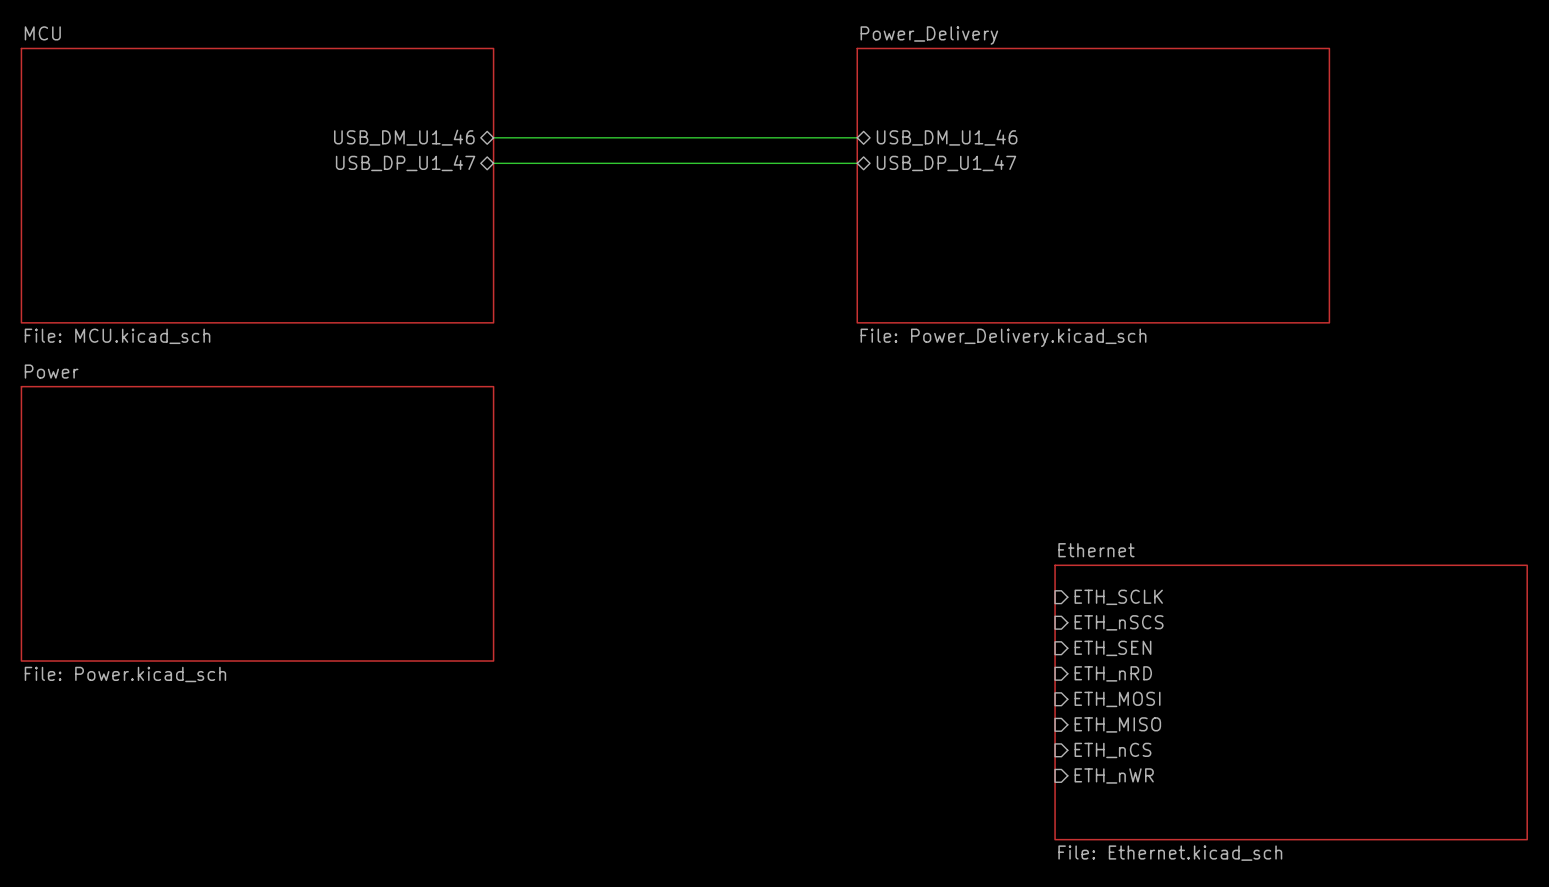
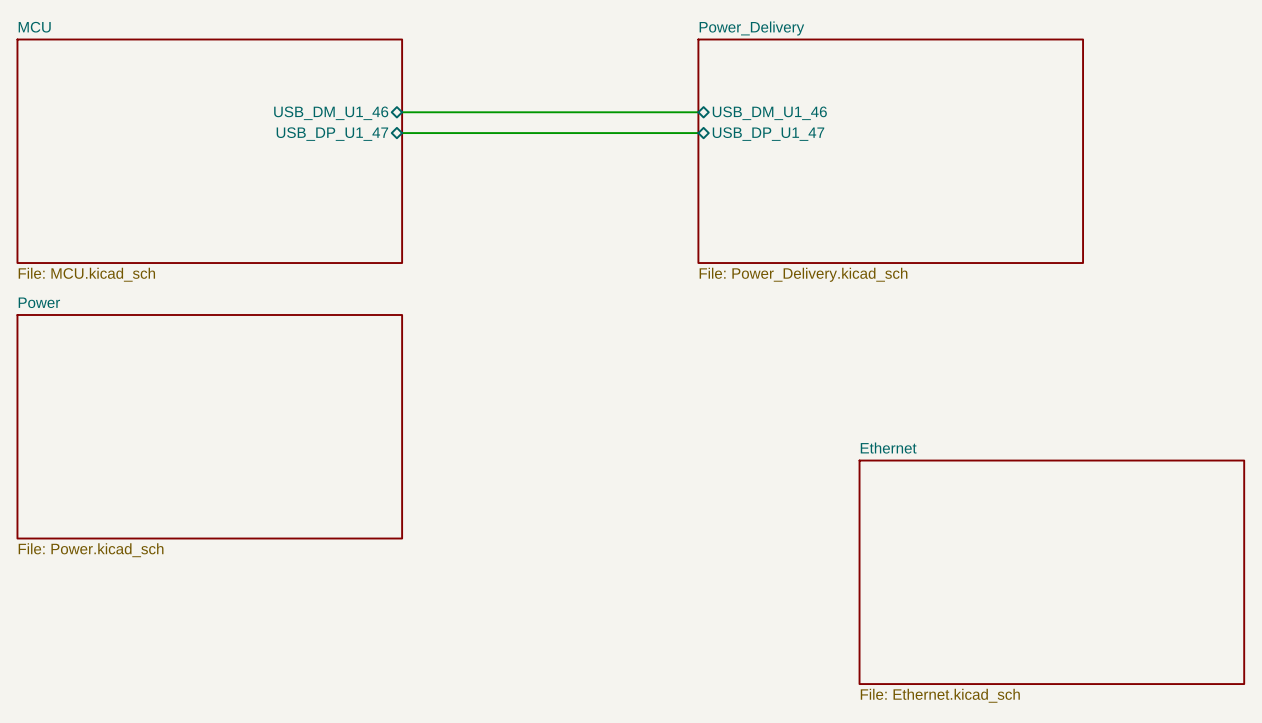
sheet pin: ETH_SCLK (1118, 597) -> none
sheet pin: ETH_nSCS (1119, 622) -> none
sheet pin: ETH_SEN (1112, 648) -> none
sheet pin: ETH_nRD (1113, 673) -> none
sheet pin: ETH_MOSI (1117, 699) -> none
sheet pin: ETH_MISO (1117, 724) -> none
sheet pin: ETH_nCS (1112, 750) -> none
sheet pin: ETH_nWR (1114, 775) -> none

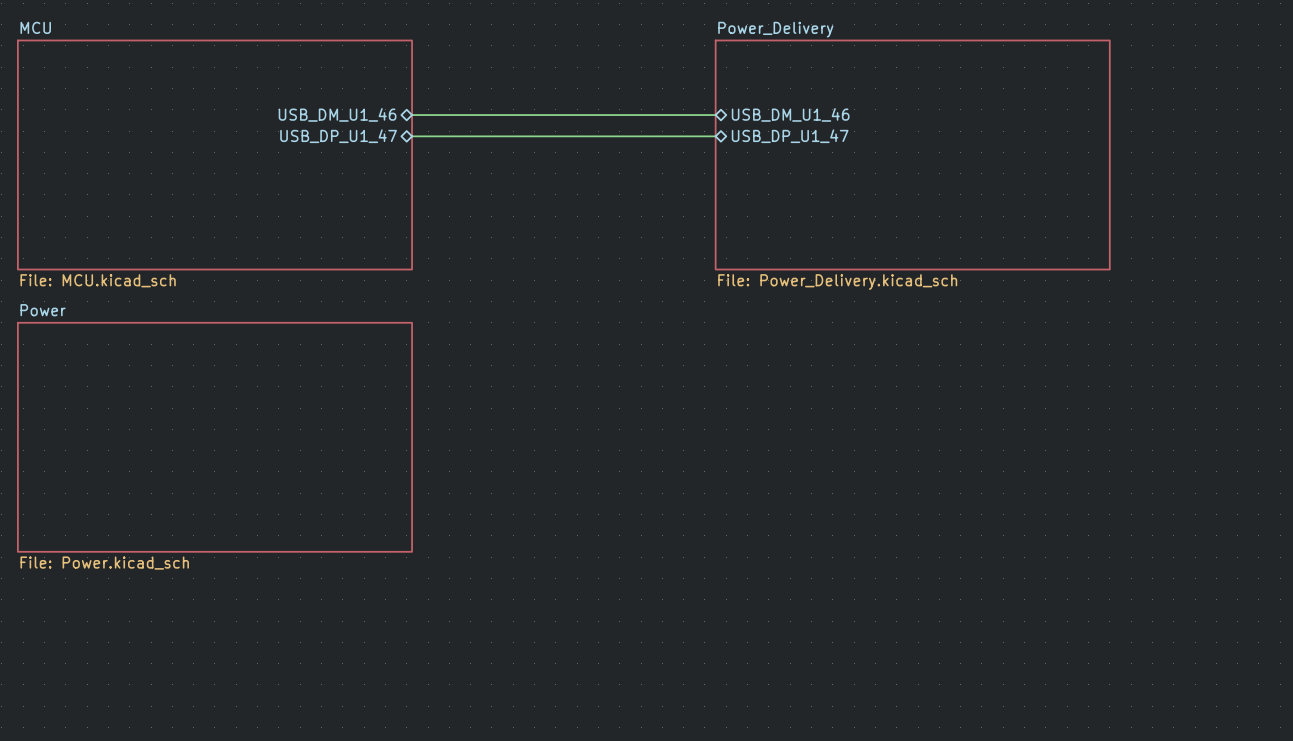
sheet Ethernet: File: Ethernet.kicad_sch (1051, 572) -> none

